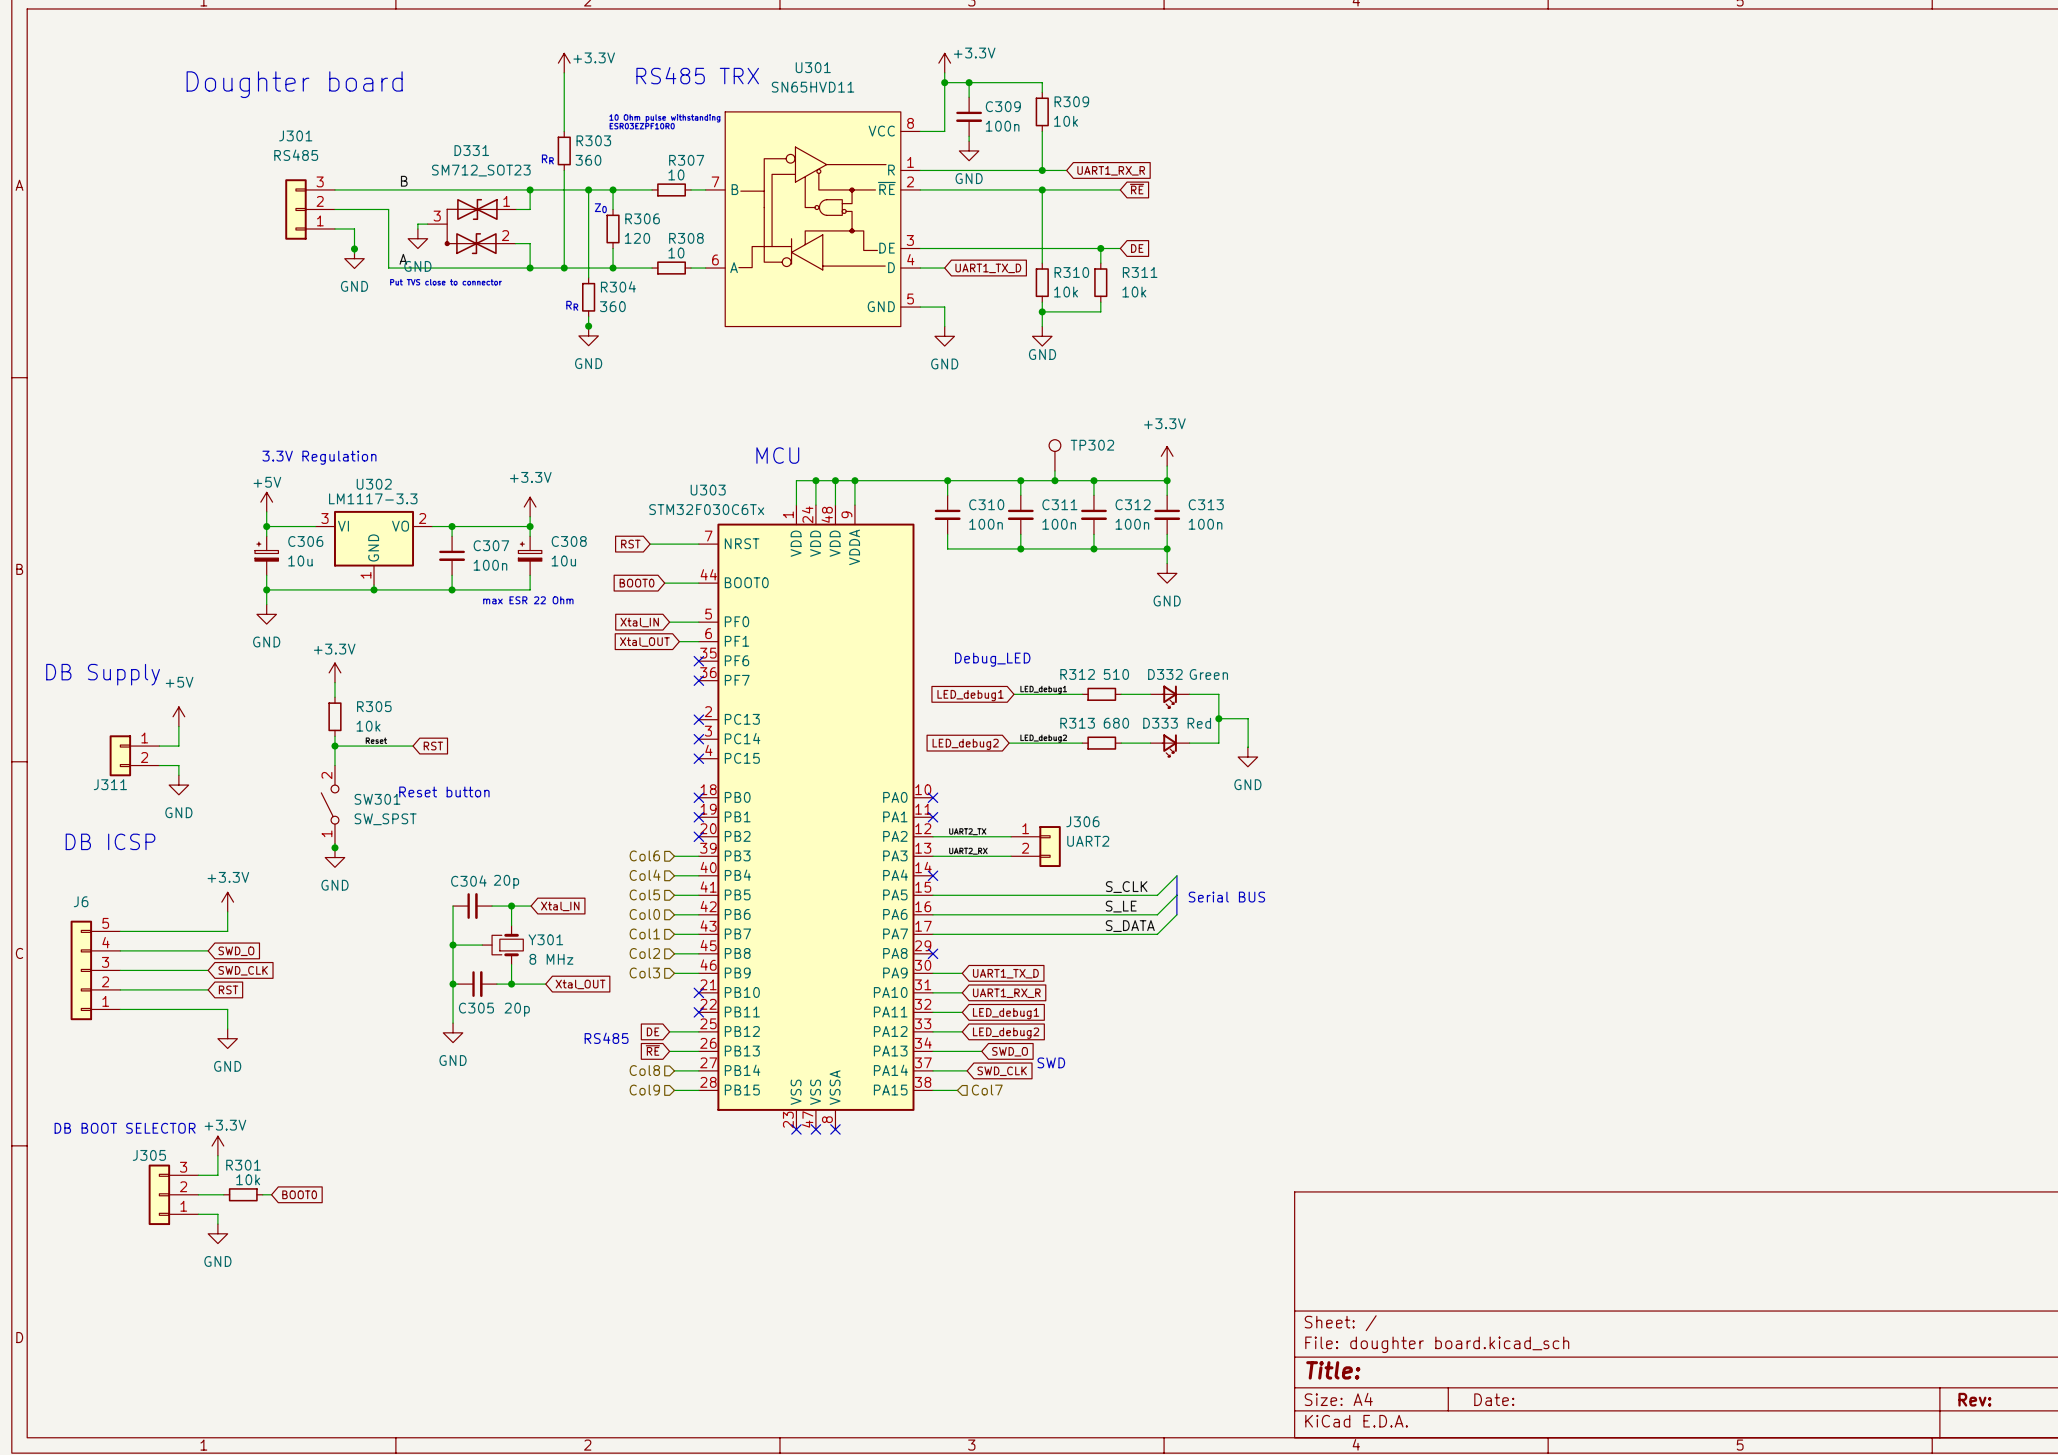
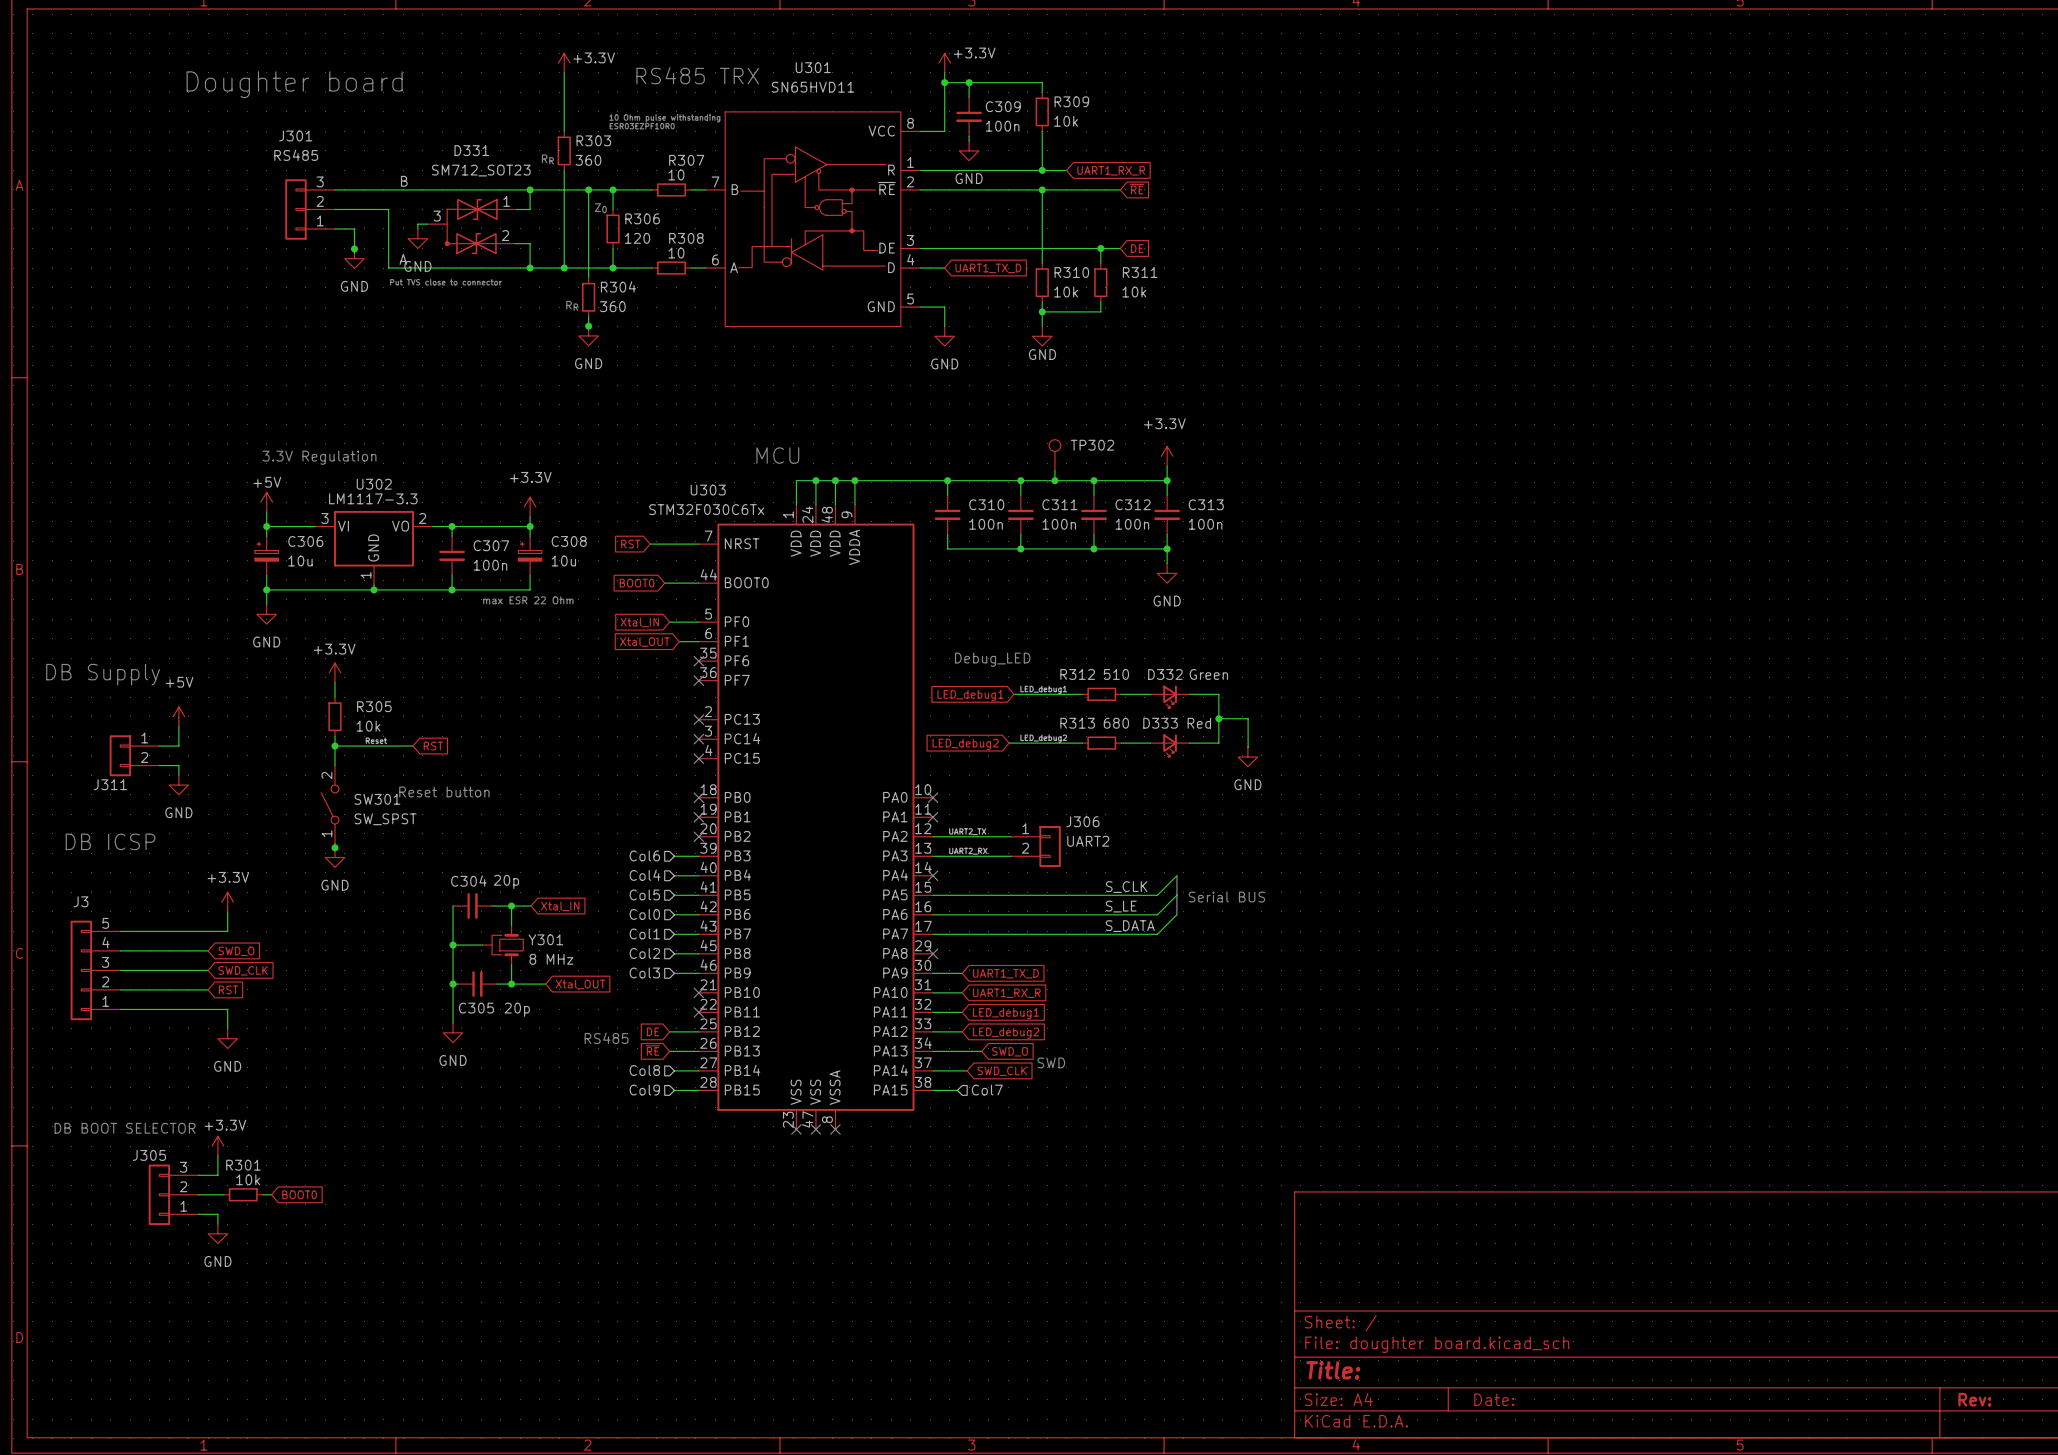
J6 name: J6 (81, 901) -> J3 (81, 901)

